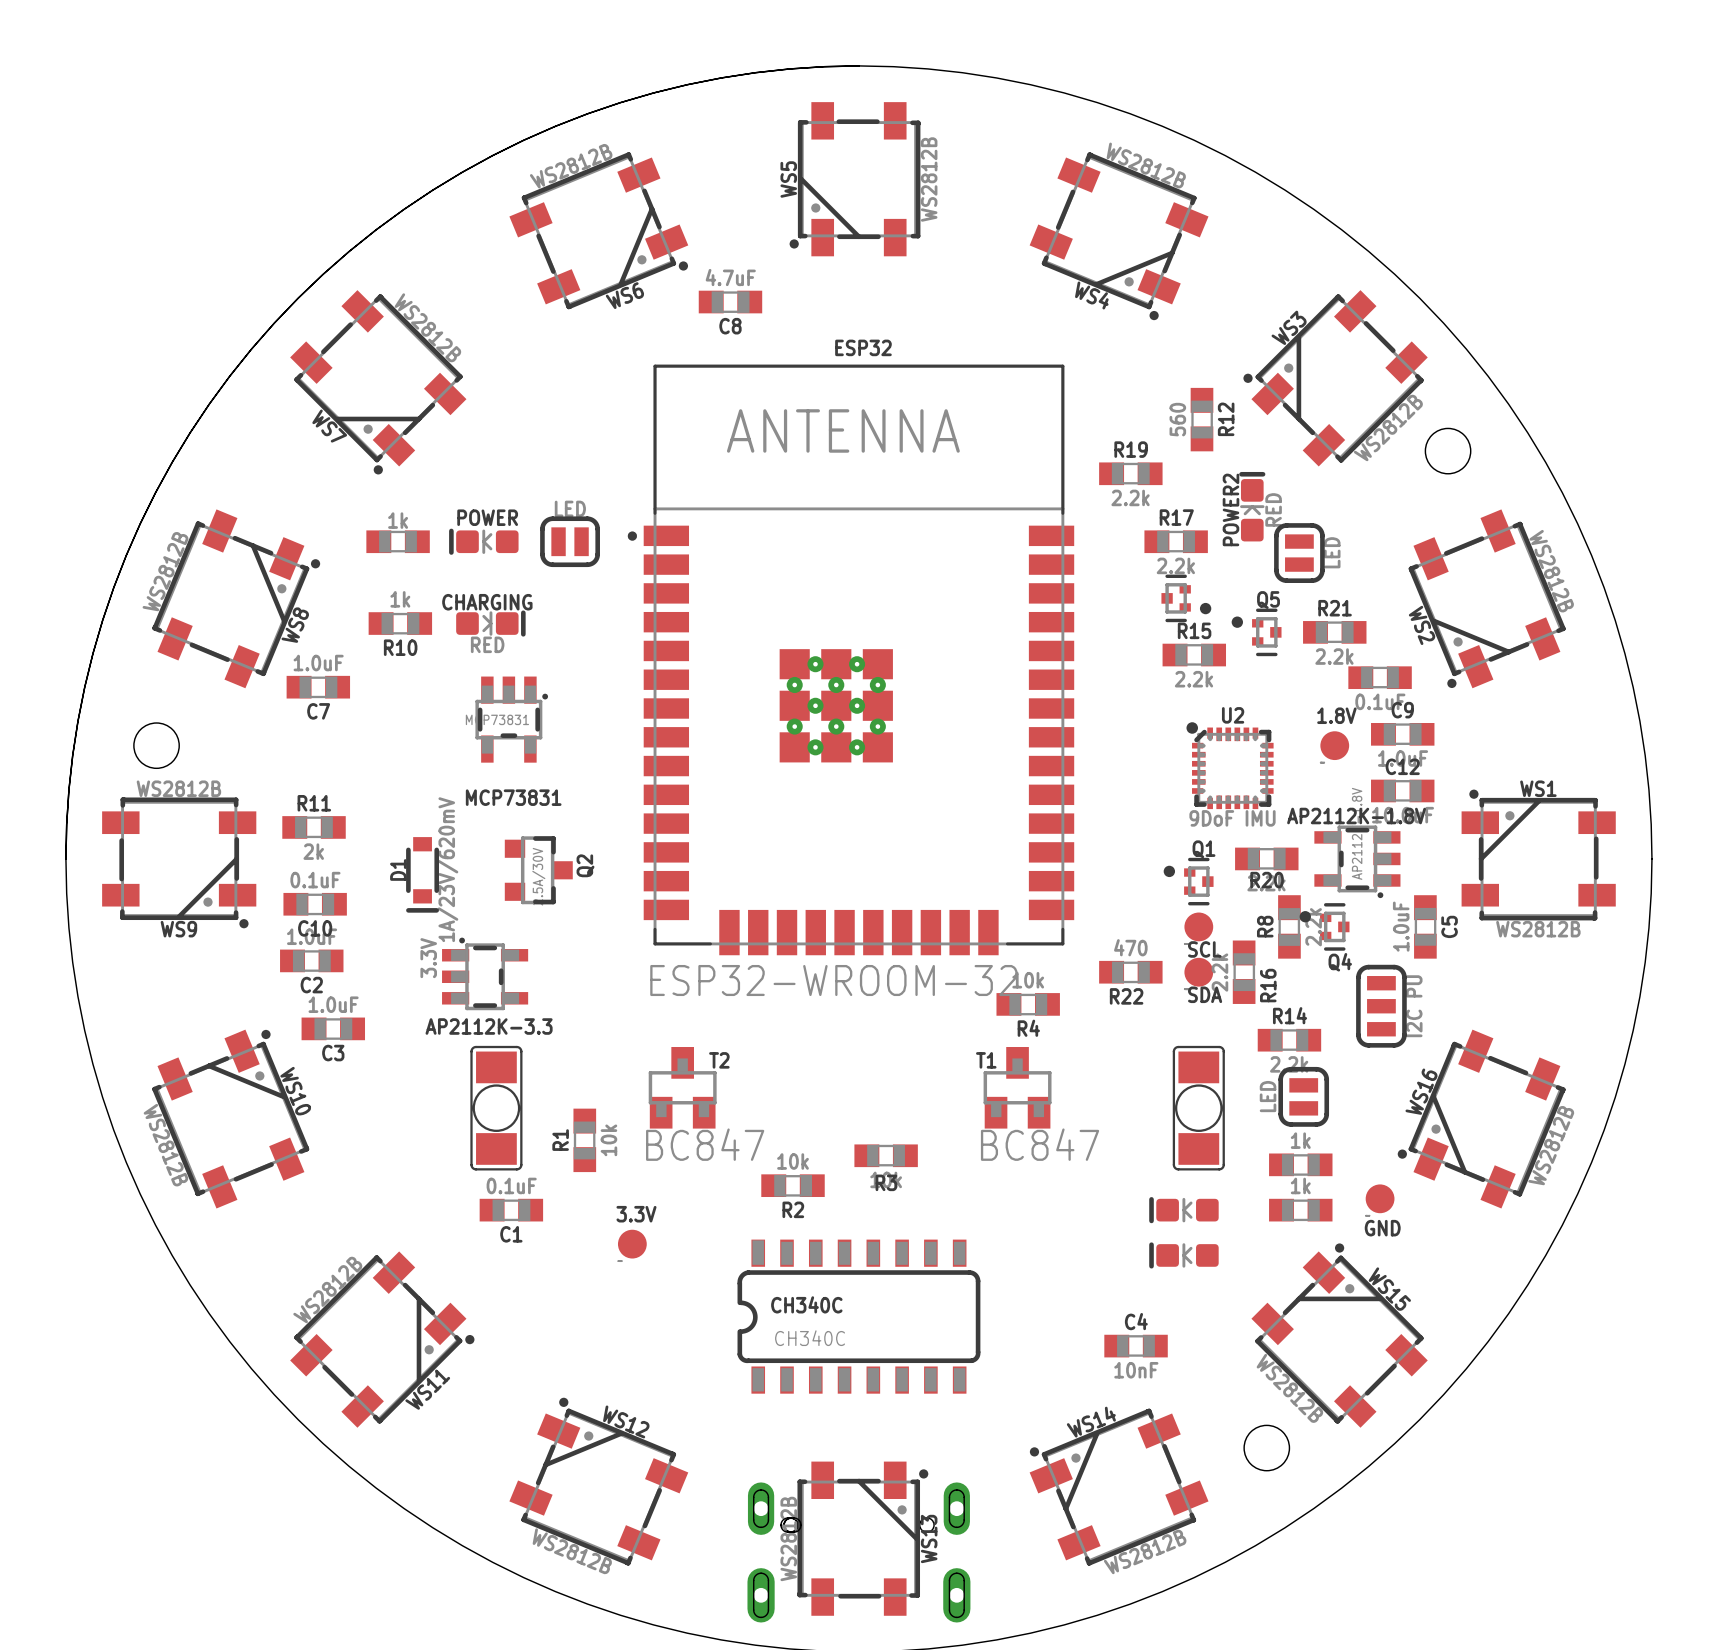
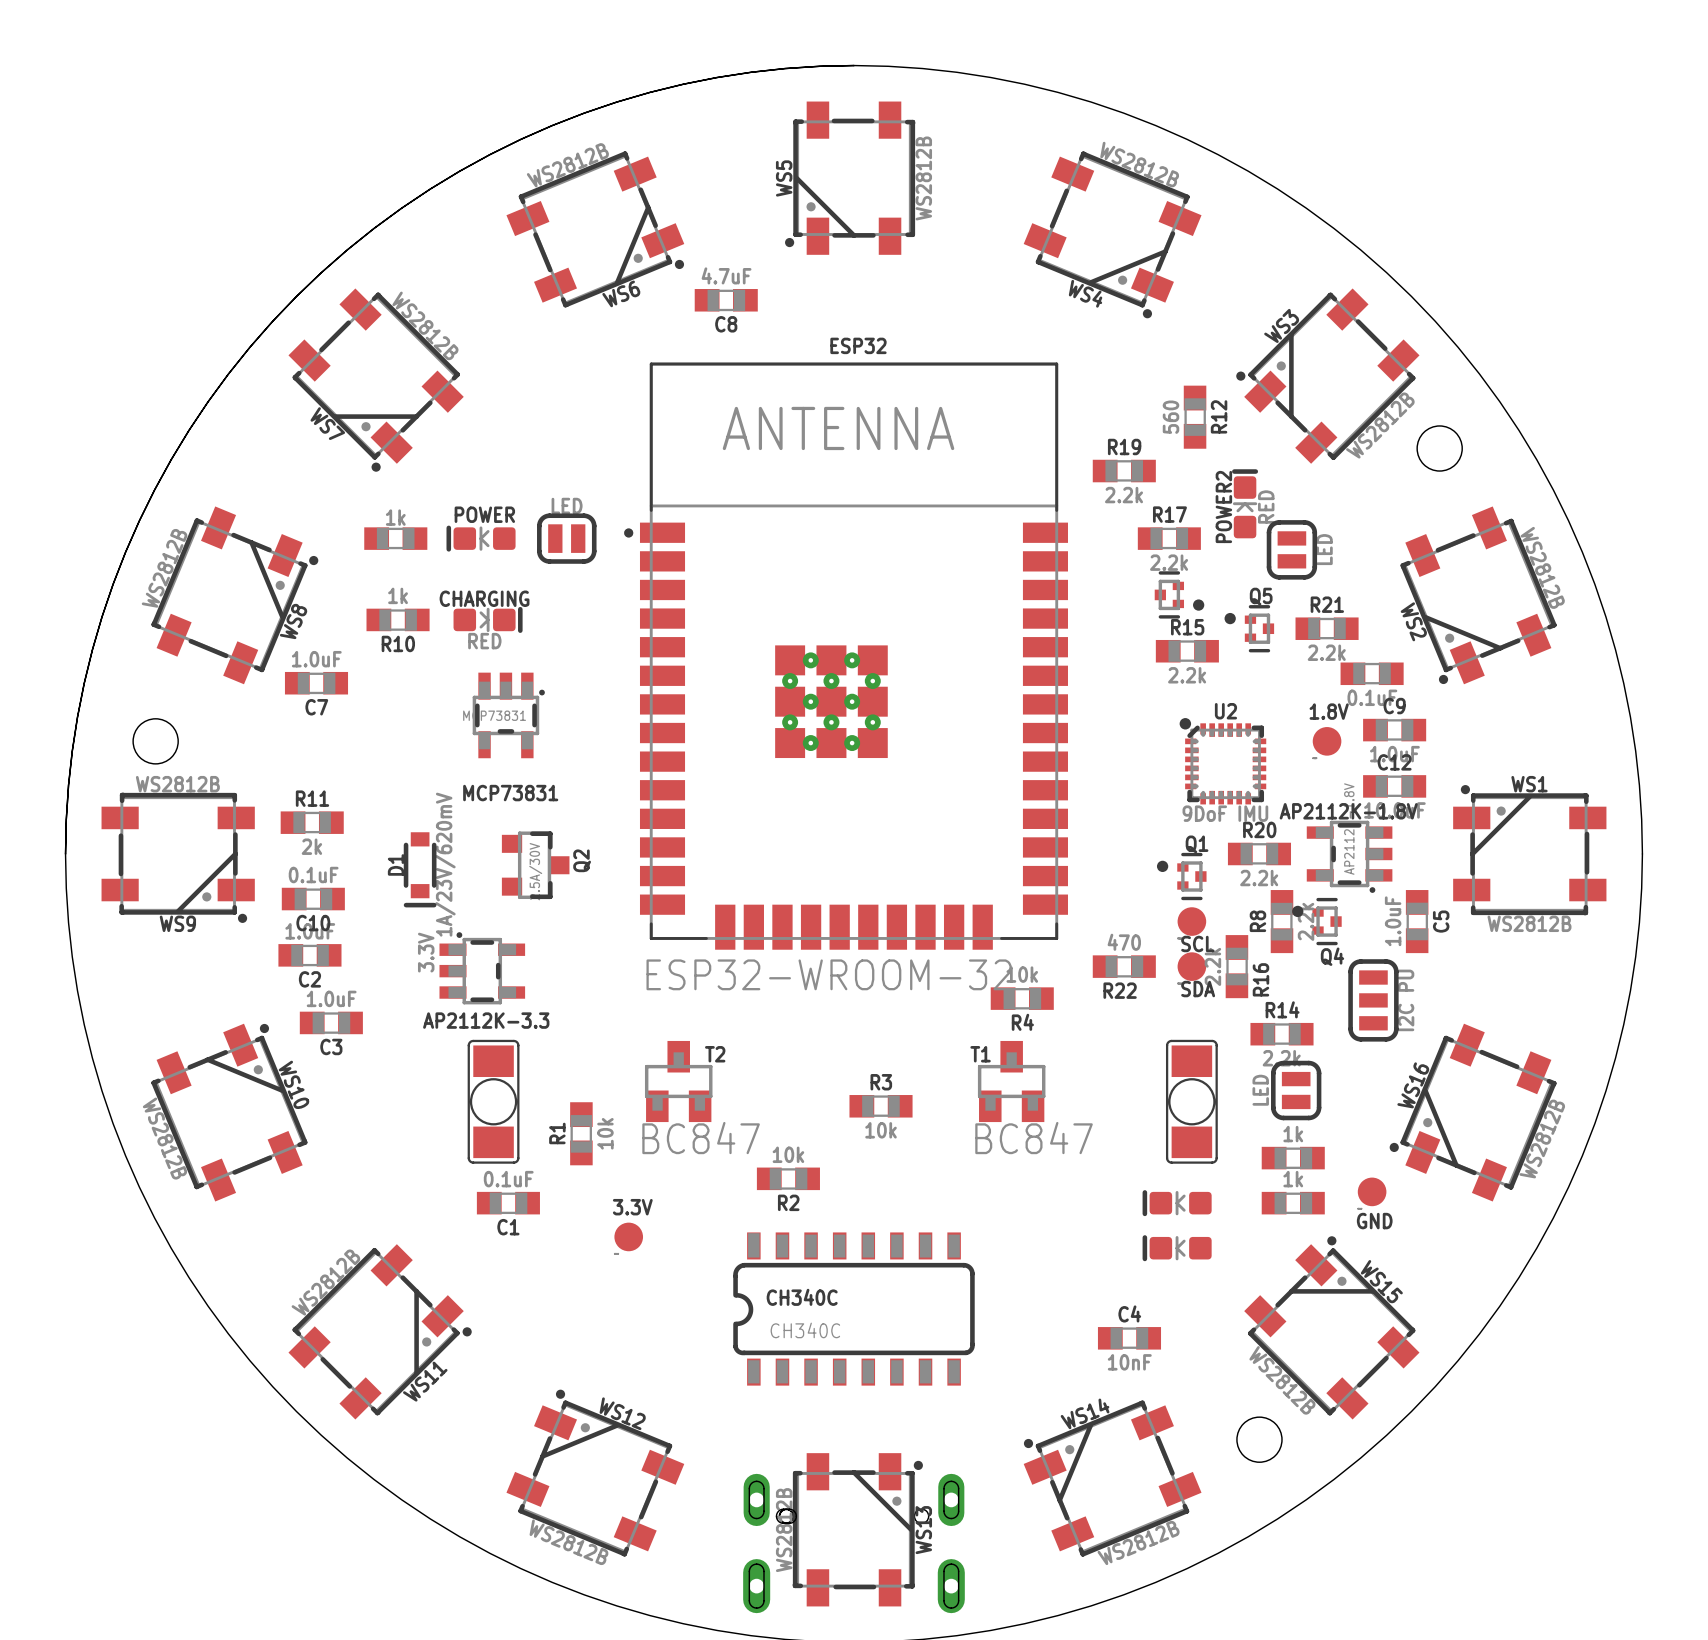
R20 name position: R20 (1267, 880) -> R20 (1259, 829)
R3 position: (886, 1155) -> (881, 1106)
R3 name position: R3 (886, 1182) -> R3 (881, 1082)

